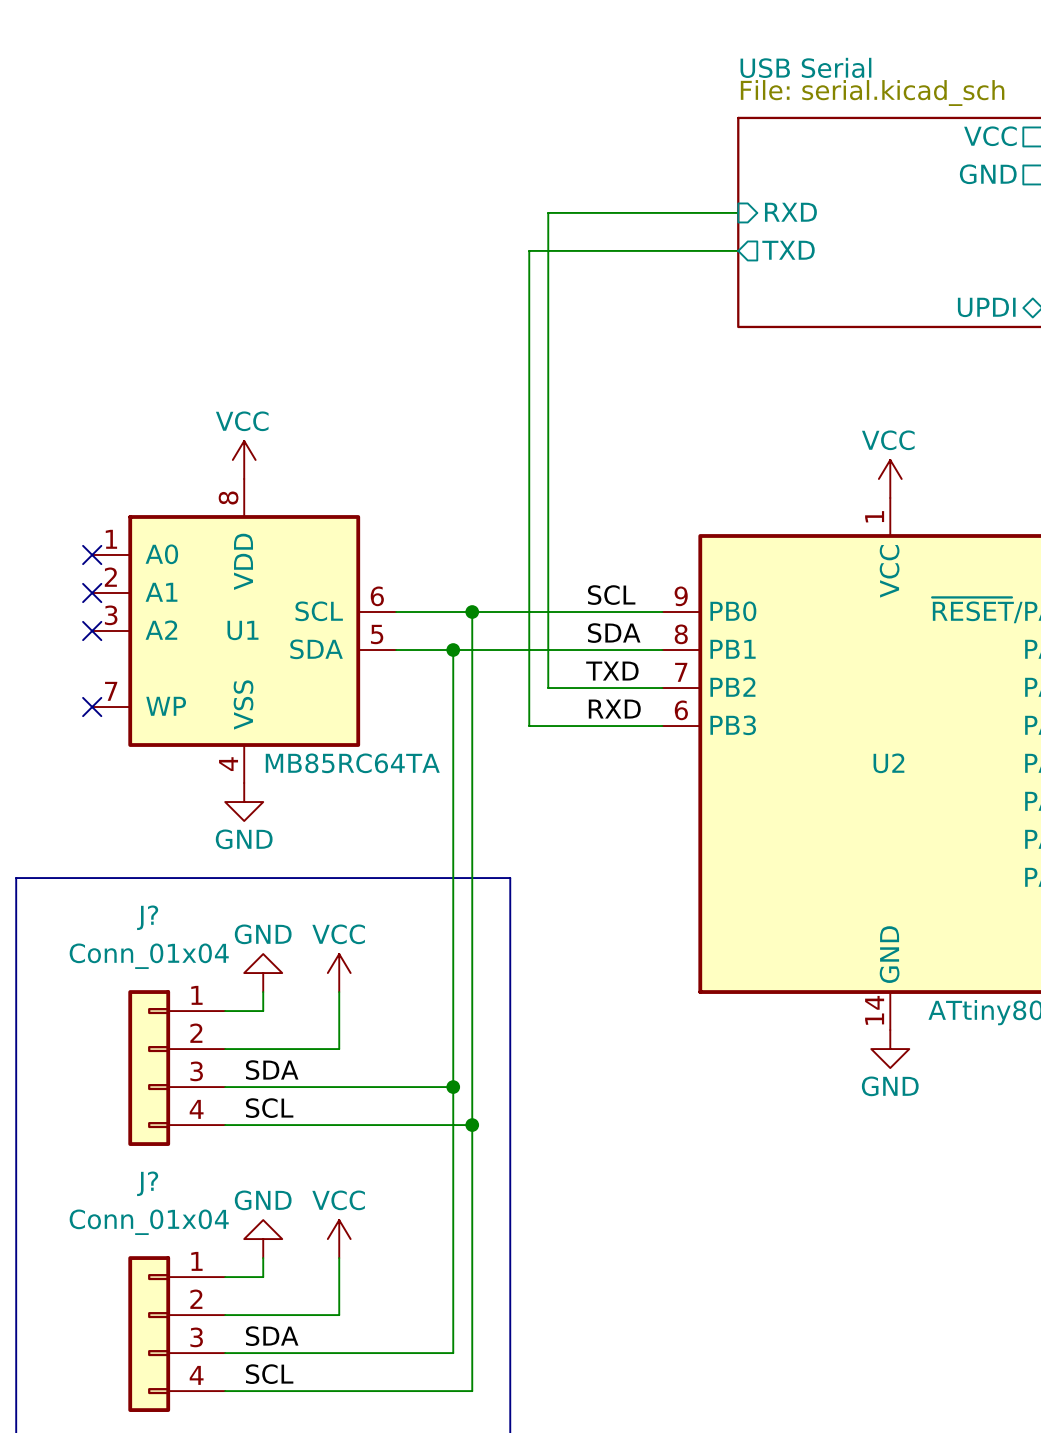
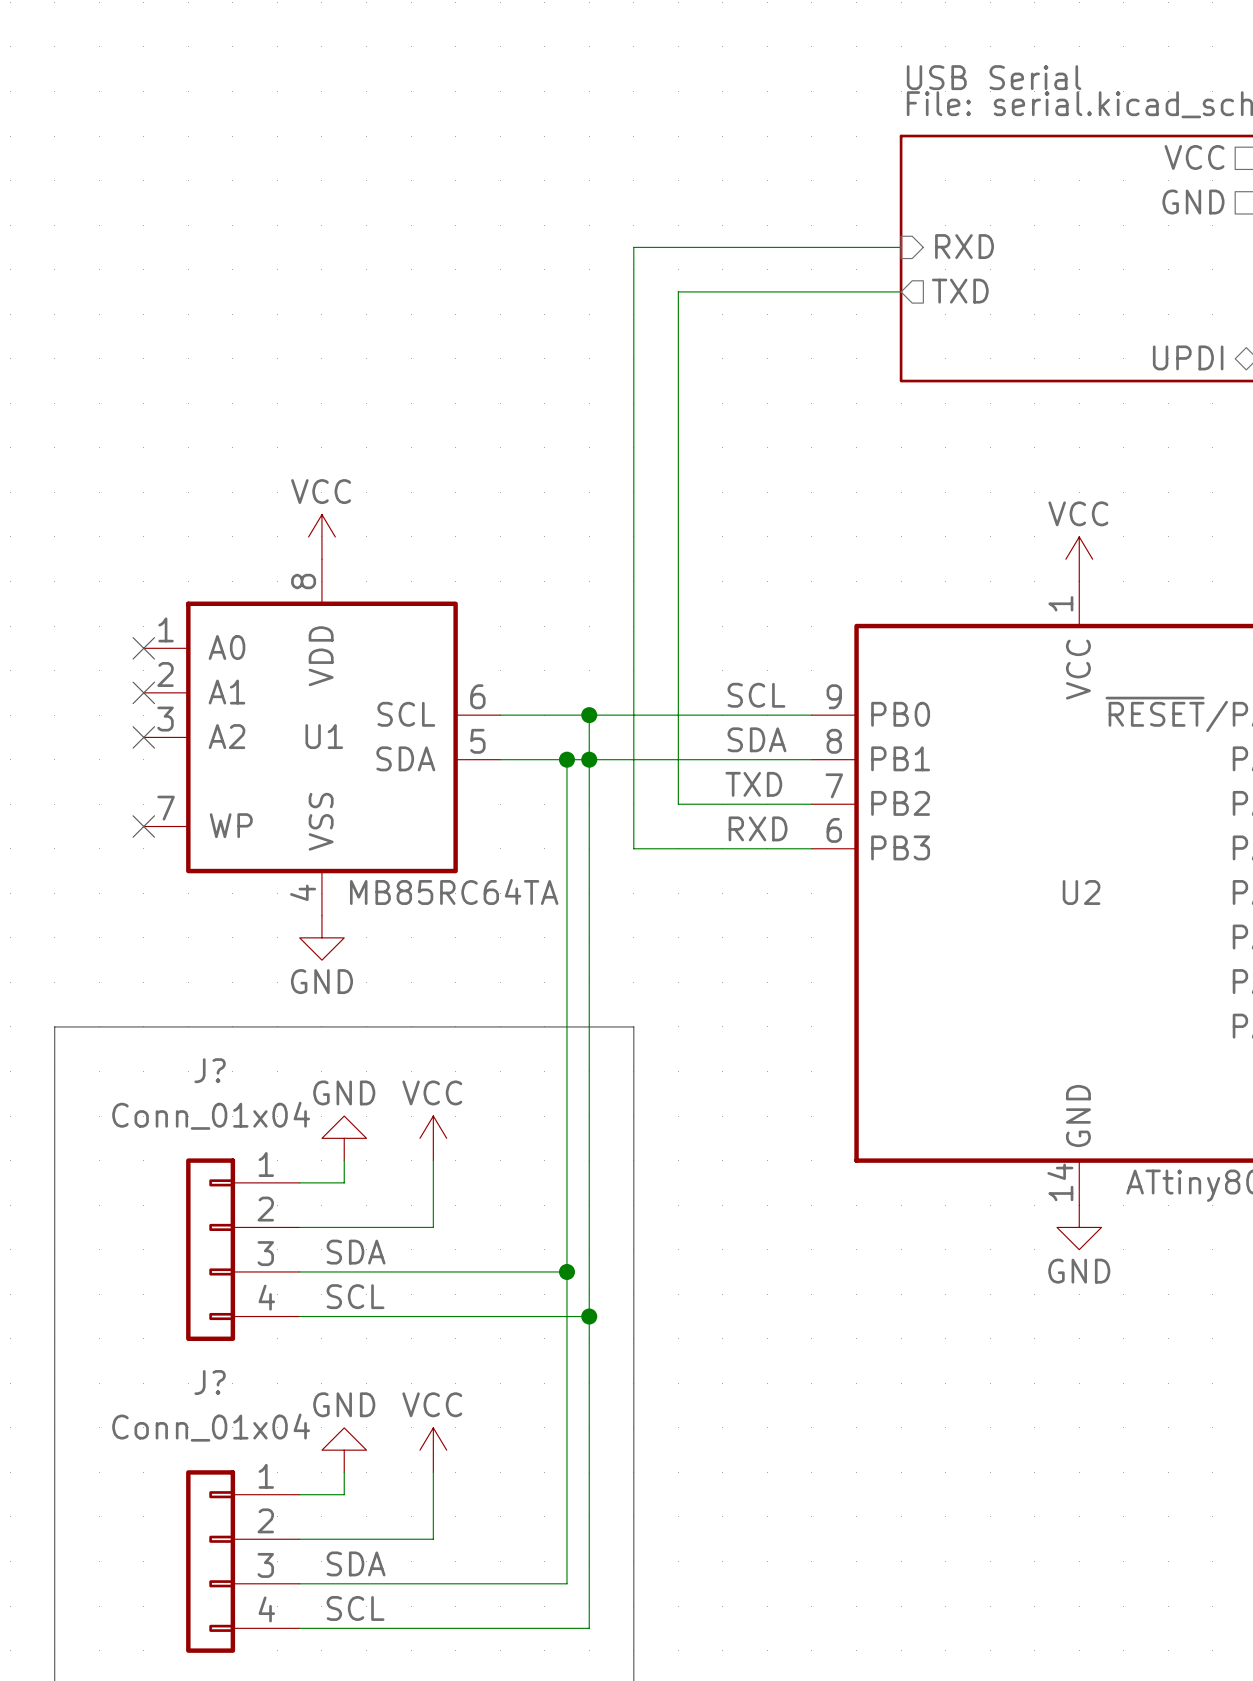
wire: (548, 212) (548, 250) (529, 250) (529, 726) -> (678, 247) (633, 247) (633, 848) (656, 848)
junction: none -> (589, 759)

